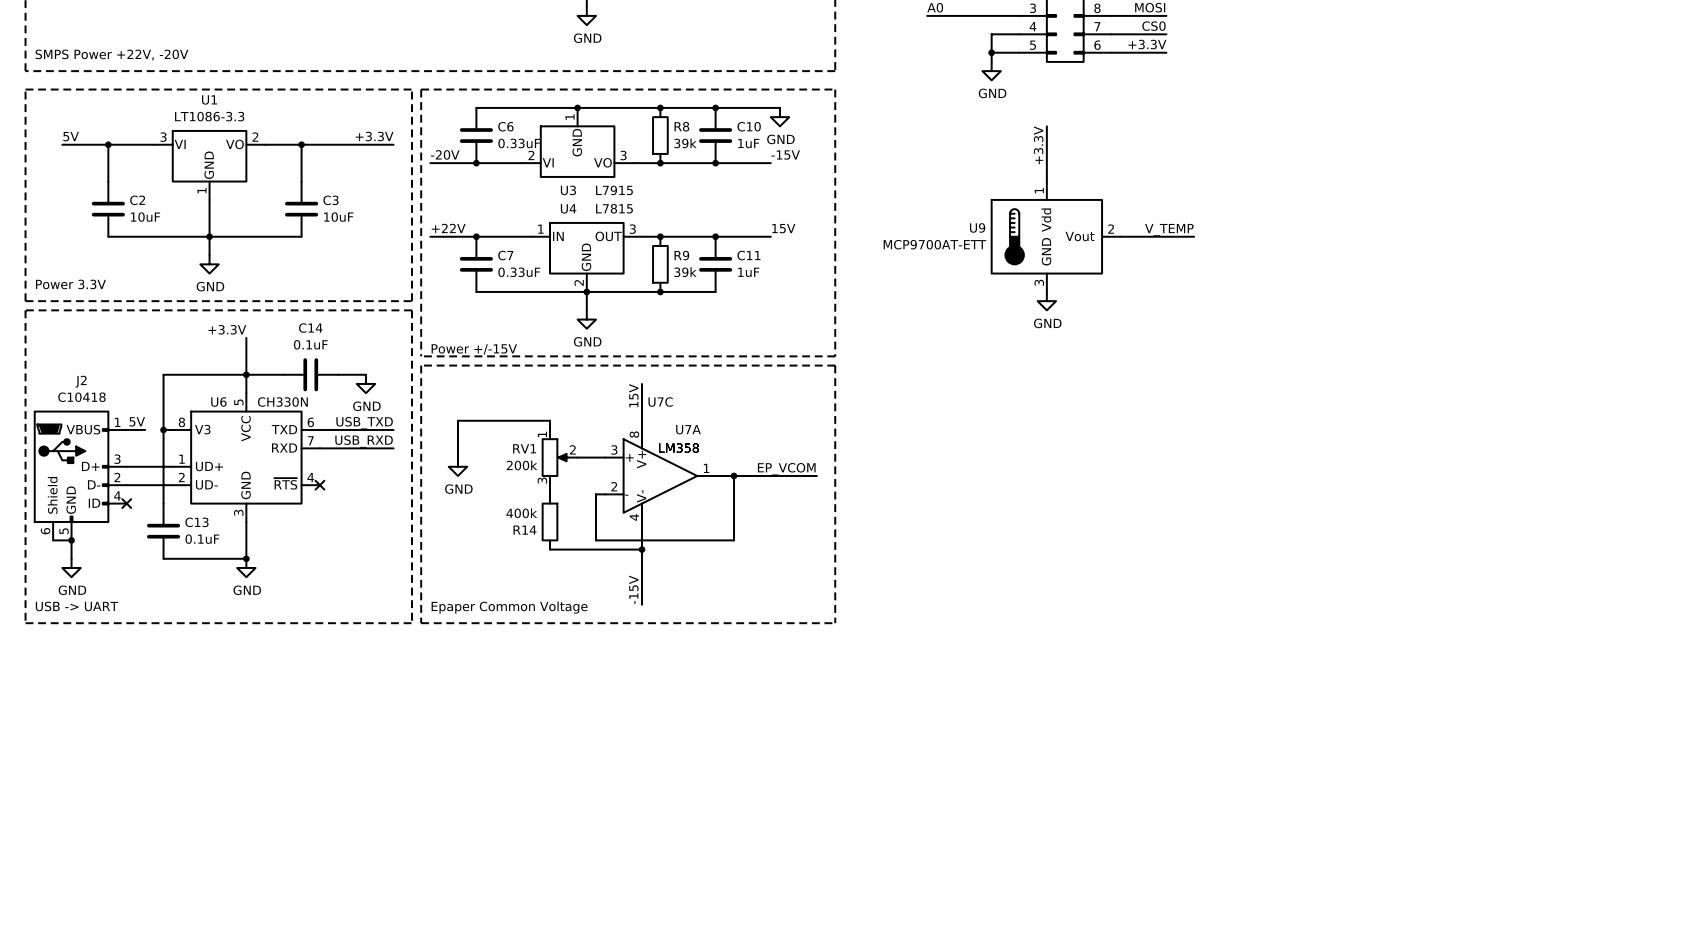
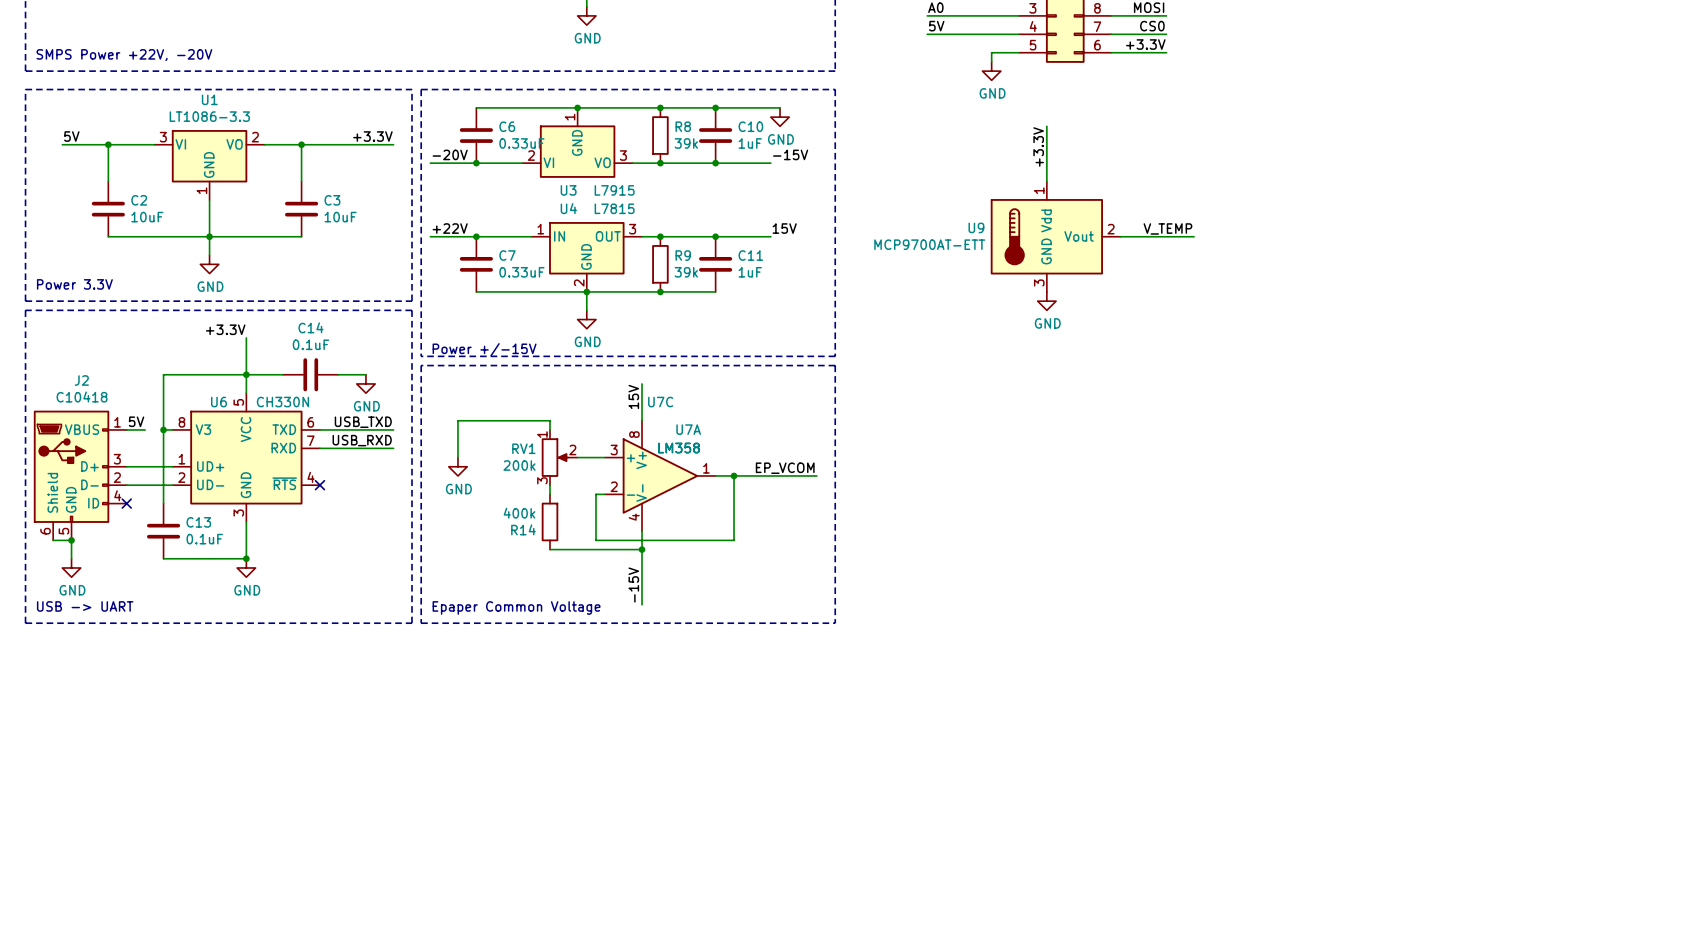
label: none -> 5V (936, 26)
wire: (991, 34) (991, 52) -> (991, 34) (927, 34)
junction: (991, 52) -> none

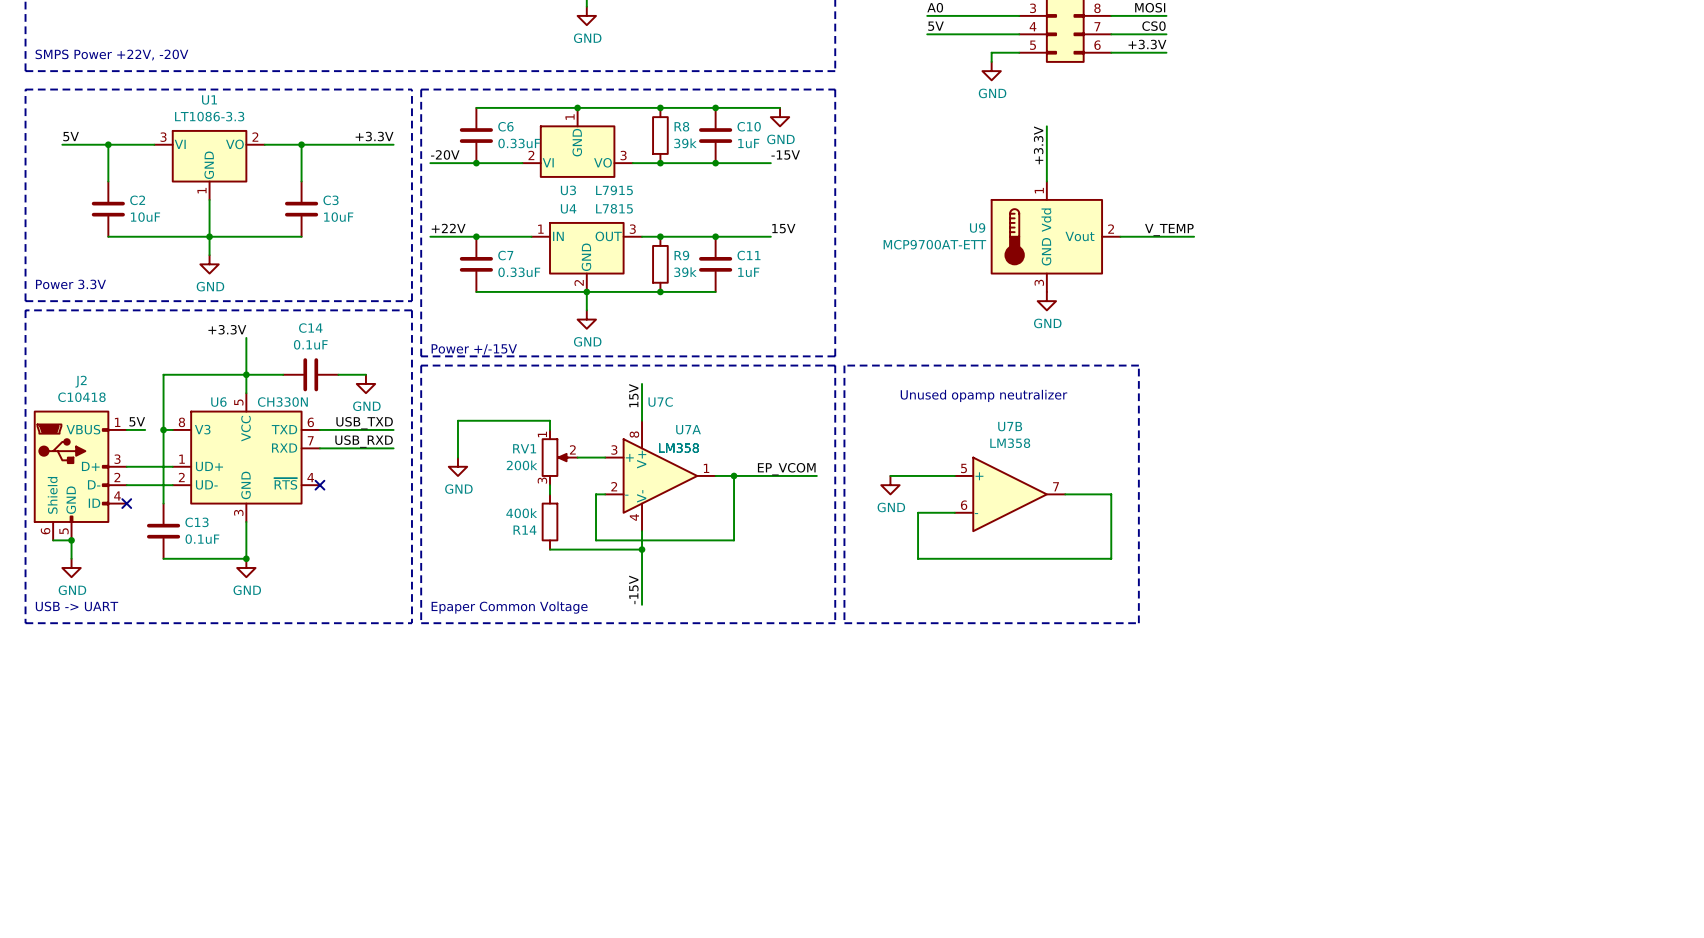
line: none -> (844, 365) (844, 623) (1138, 623) (1138, 365) (844, 365)
text: none -> Unused opamp neutralizer (983, 395)
wire: none -> (890, 475) (954, 475)
power symbol: none -> GND (890, 485)
U7B: none -> LM358 (1010, 494)
wire: none -> (1065, 494) (1111, 494) (1111, 558) (918, 558) (918, 512) (954, 512)

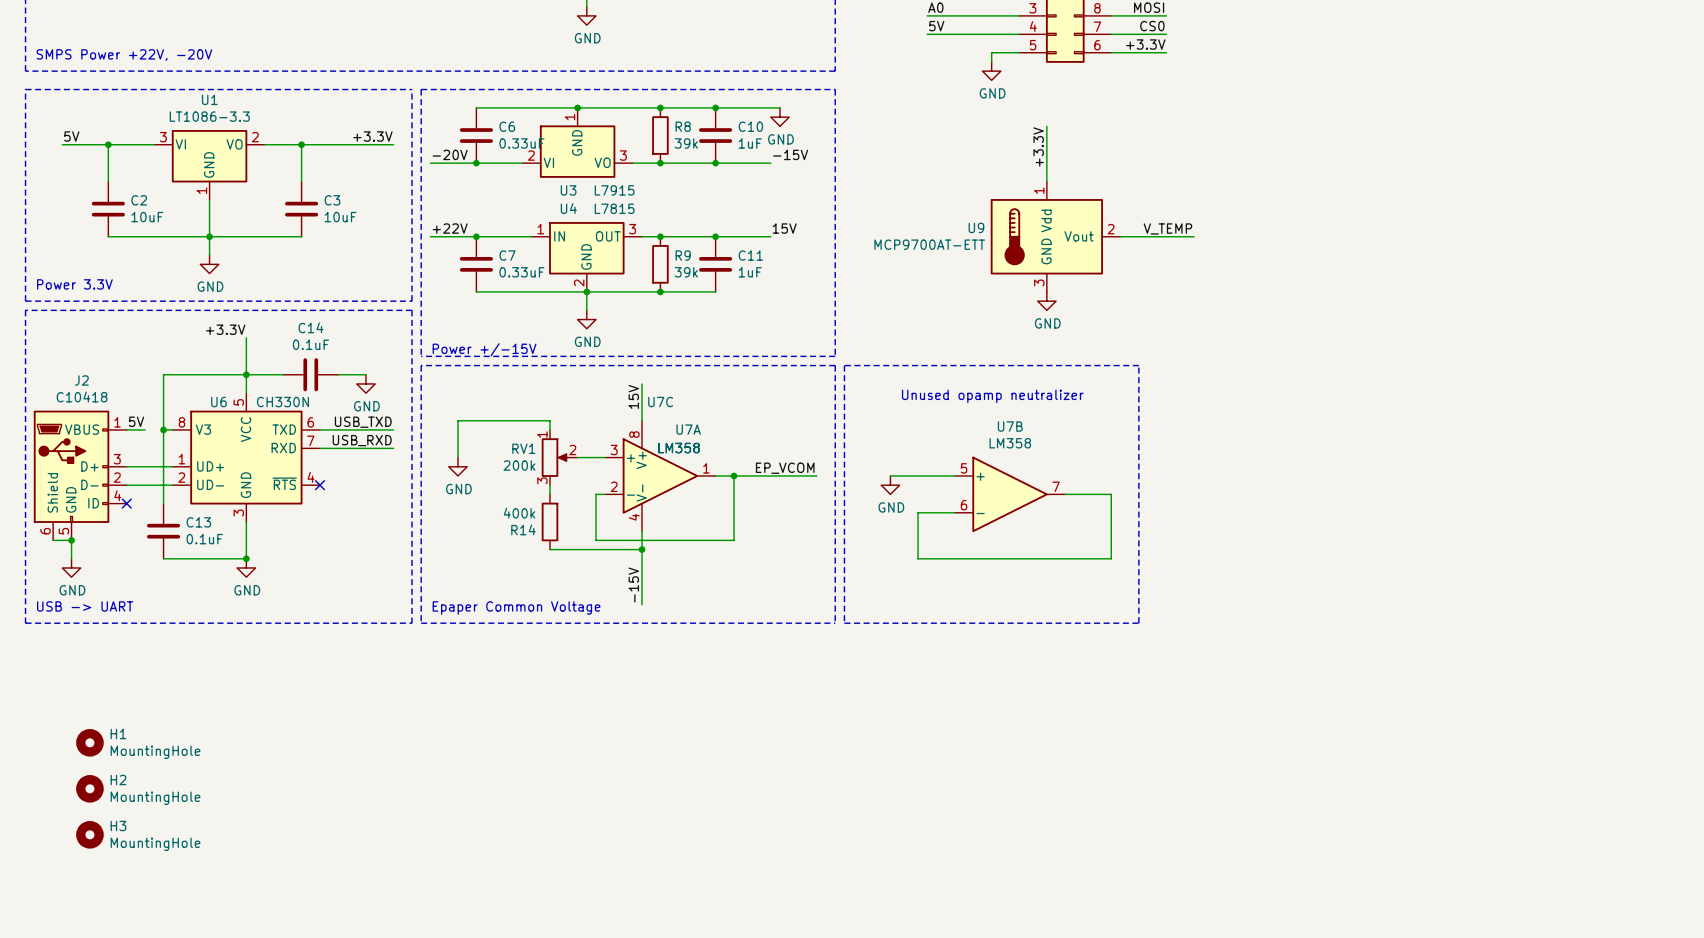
H1: none -> MountingHole (89, 742)
H2: none -> MountingHole (89, 788)
H3: none -> MountingHole (89, 834)

